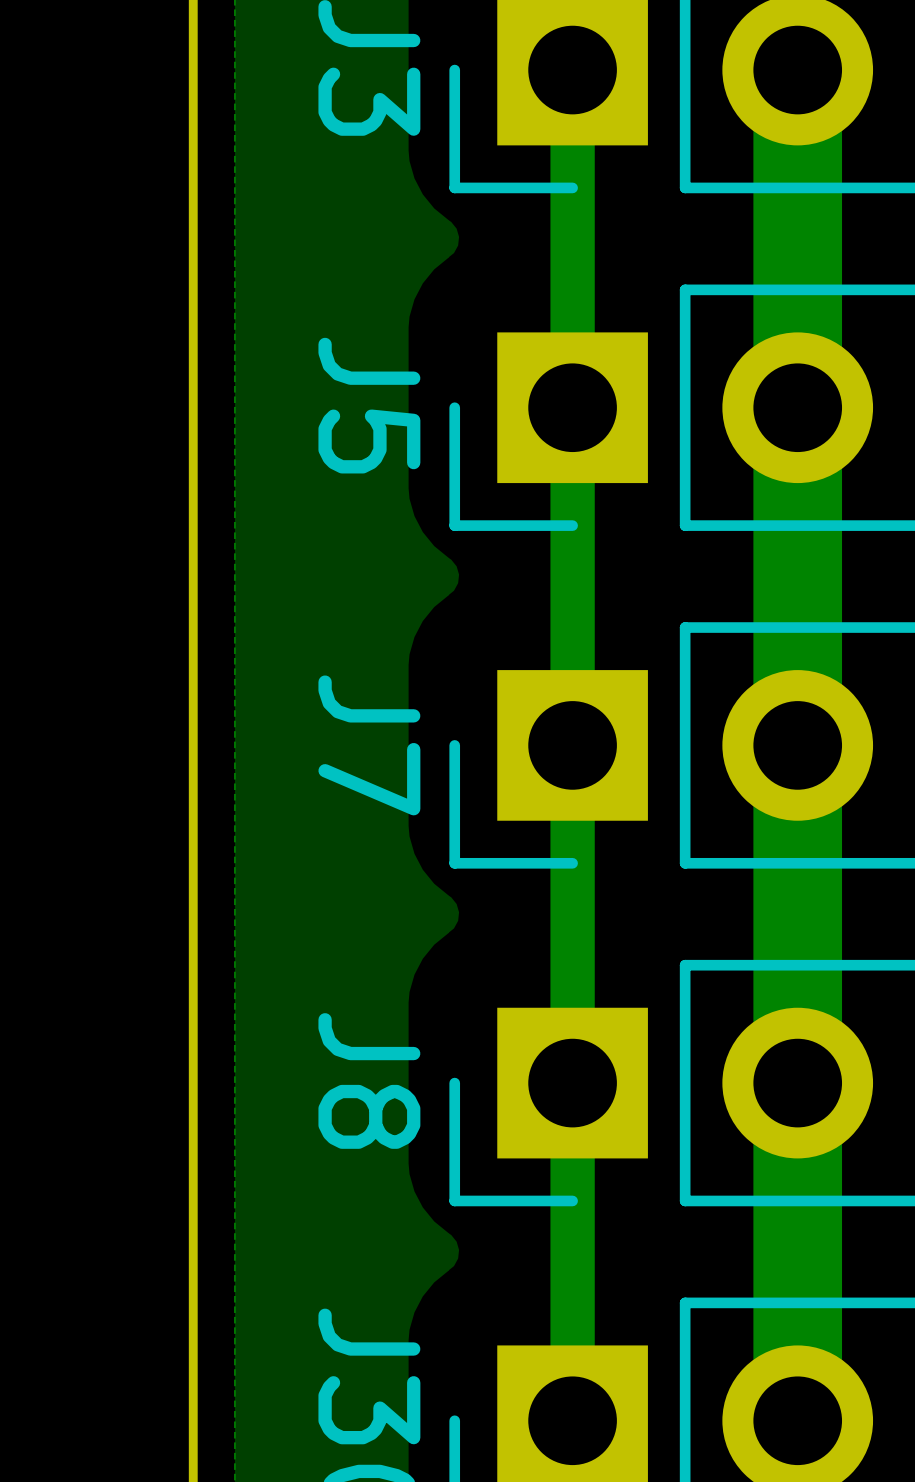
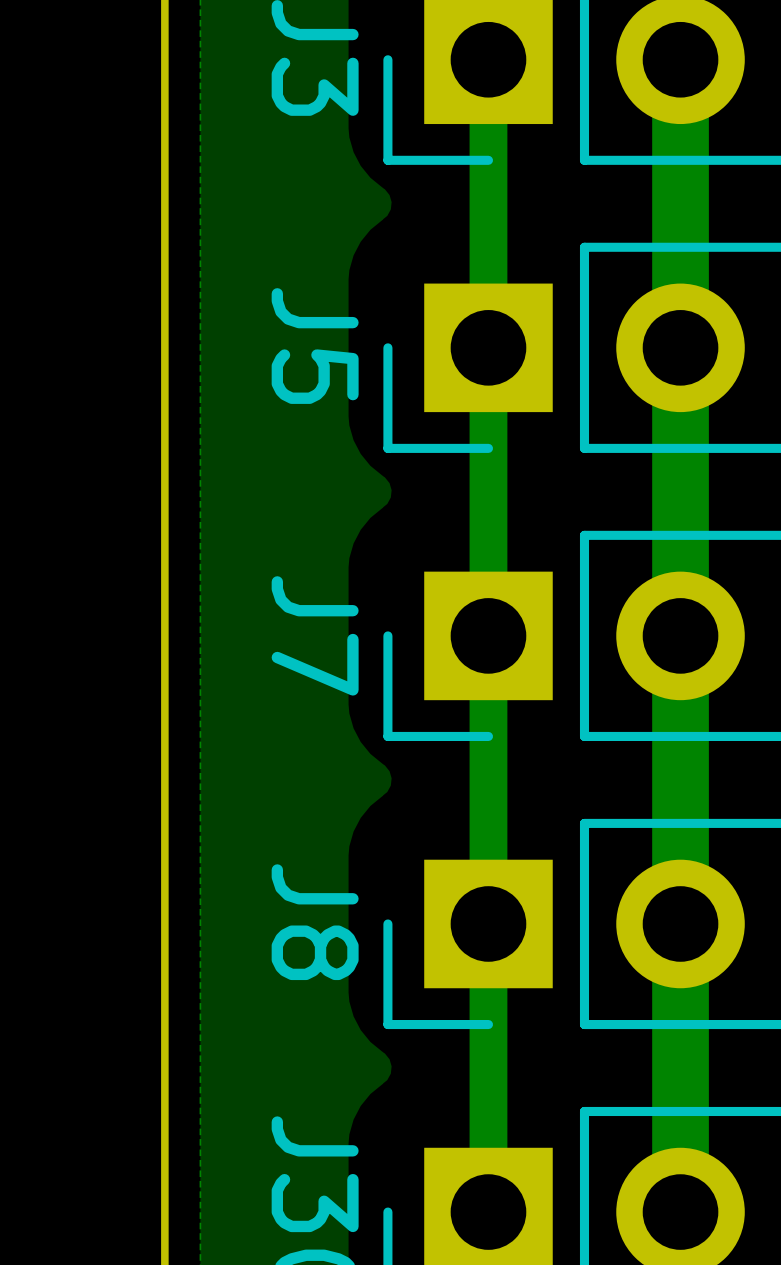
track width: thick (797, 70) (797, 1420) -> thin (680, 59) (680, 1212)

